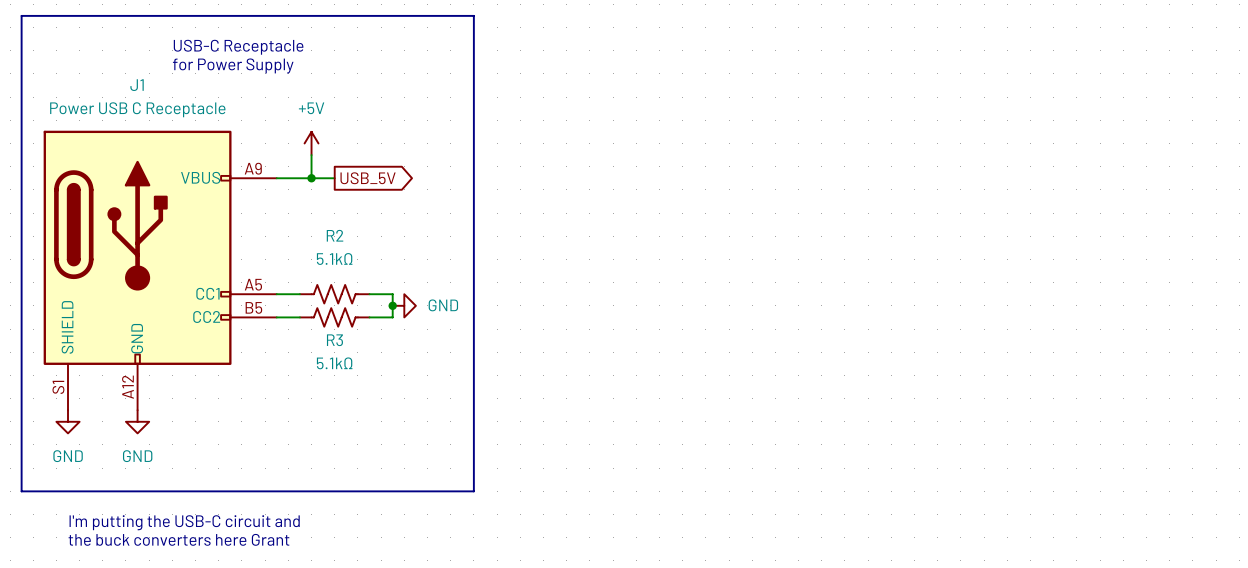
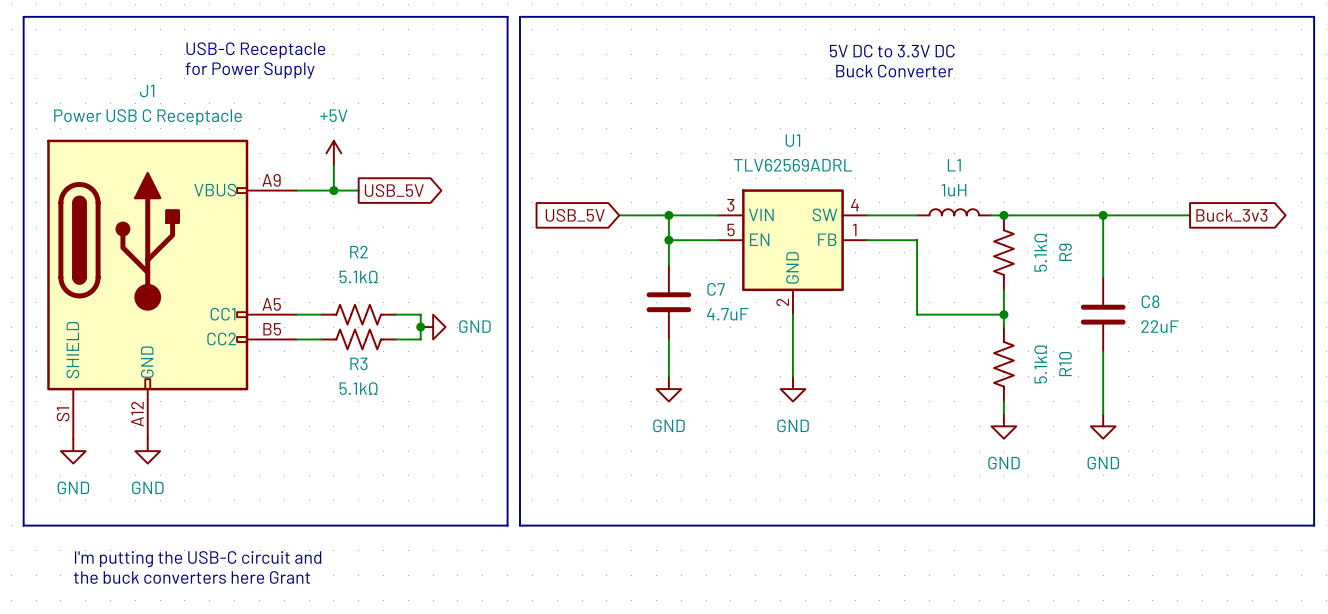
line: none -> (519, 16) (1314, 16) (1314, 525) (519, 525) (519, 16)
text: none -> 5V DC to 3.3V DC (892, 51)
text: none -> Buck Converter (894, 71)
L1: none -> 1uH (954, 212)
global label: none -> USB_5V (575, 215)
wire: none -> (619, 215) (718, 215)
wire: none -> (668, 215) (668, 265)
junction: none -> (668, 215)
wire: none -> (867, 215) (917, 215)
wire: none -> (991, 215) (1190, 215)
junction: none -> (1003, 215)
wire: none -> (1103, 215) (1103, 277)
junction: none -> (1103, 215)
global label: none -> Buck_3v3 (1231, 215)
wire: none -> (668, 240) (718, 240)
junction: none -> (668, 240)
wire: none -> (867, 240) (917, 240) (917, 314) (1003, 314)
U1: none -> TLV62569ADRL (792, 251)
R9: none -> 5.1kΩ (1003, 252)
wire: none -> (1003, 289) (1003, 327)
C7: none -> 4.7uF (668, 302)
wire: none -> (792, 314) (792, 376)
junction: none -> (1003, 314)
C8: none -> 22uF (1103, 314)
wire: none -> (668, 339) (668, 376)
wire: none -> (1103, 351) (1103, 413)
R10: none -> 5.1kΩ (1003, 364)
power symbol: none -> GND (668, 389)
power symbol: none -> GND (792, 389)
wire: none -> (1003, 401) (1003, 413)
power symbol: none -> GND (1003, 426)
power symbol: none -> GND (1103, 426)

